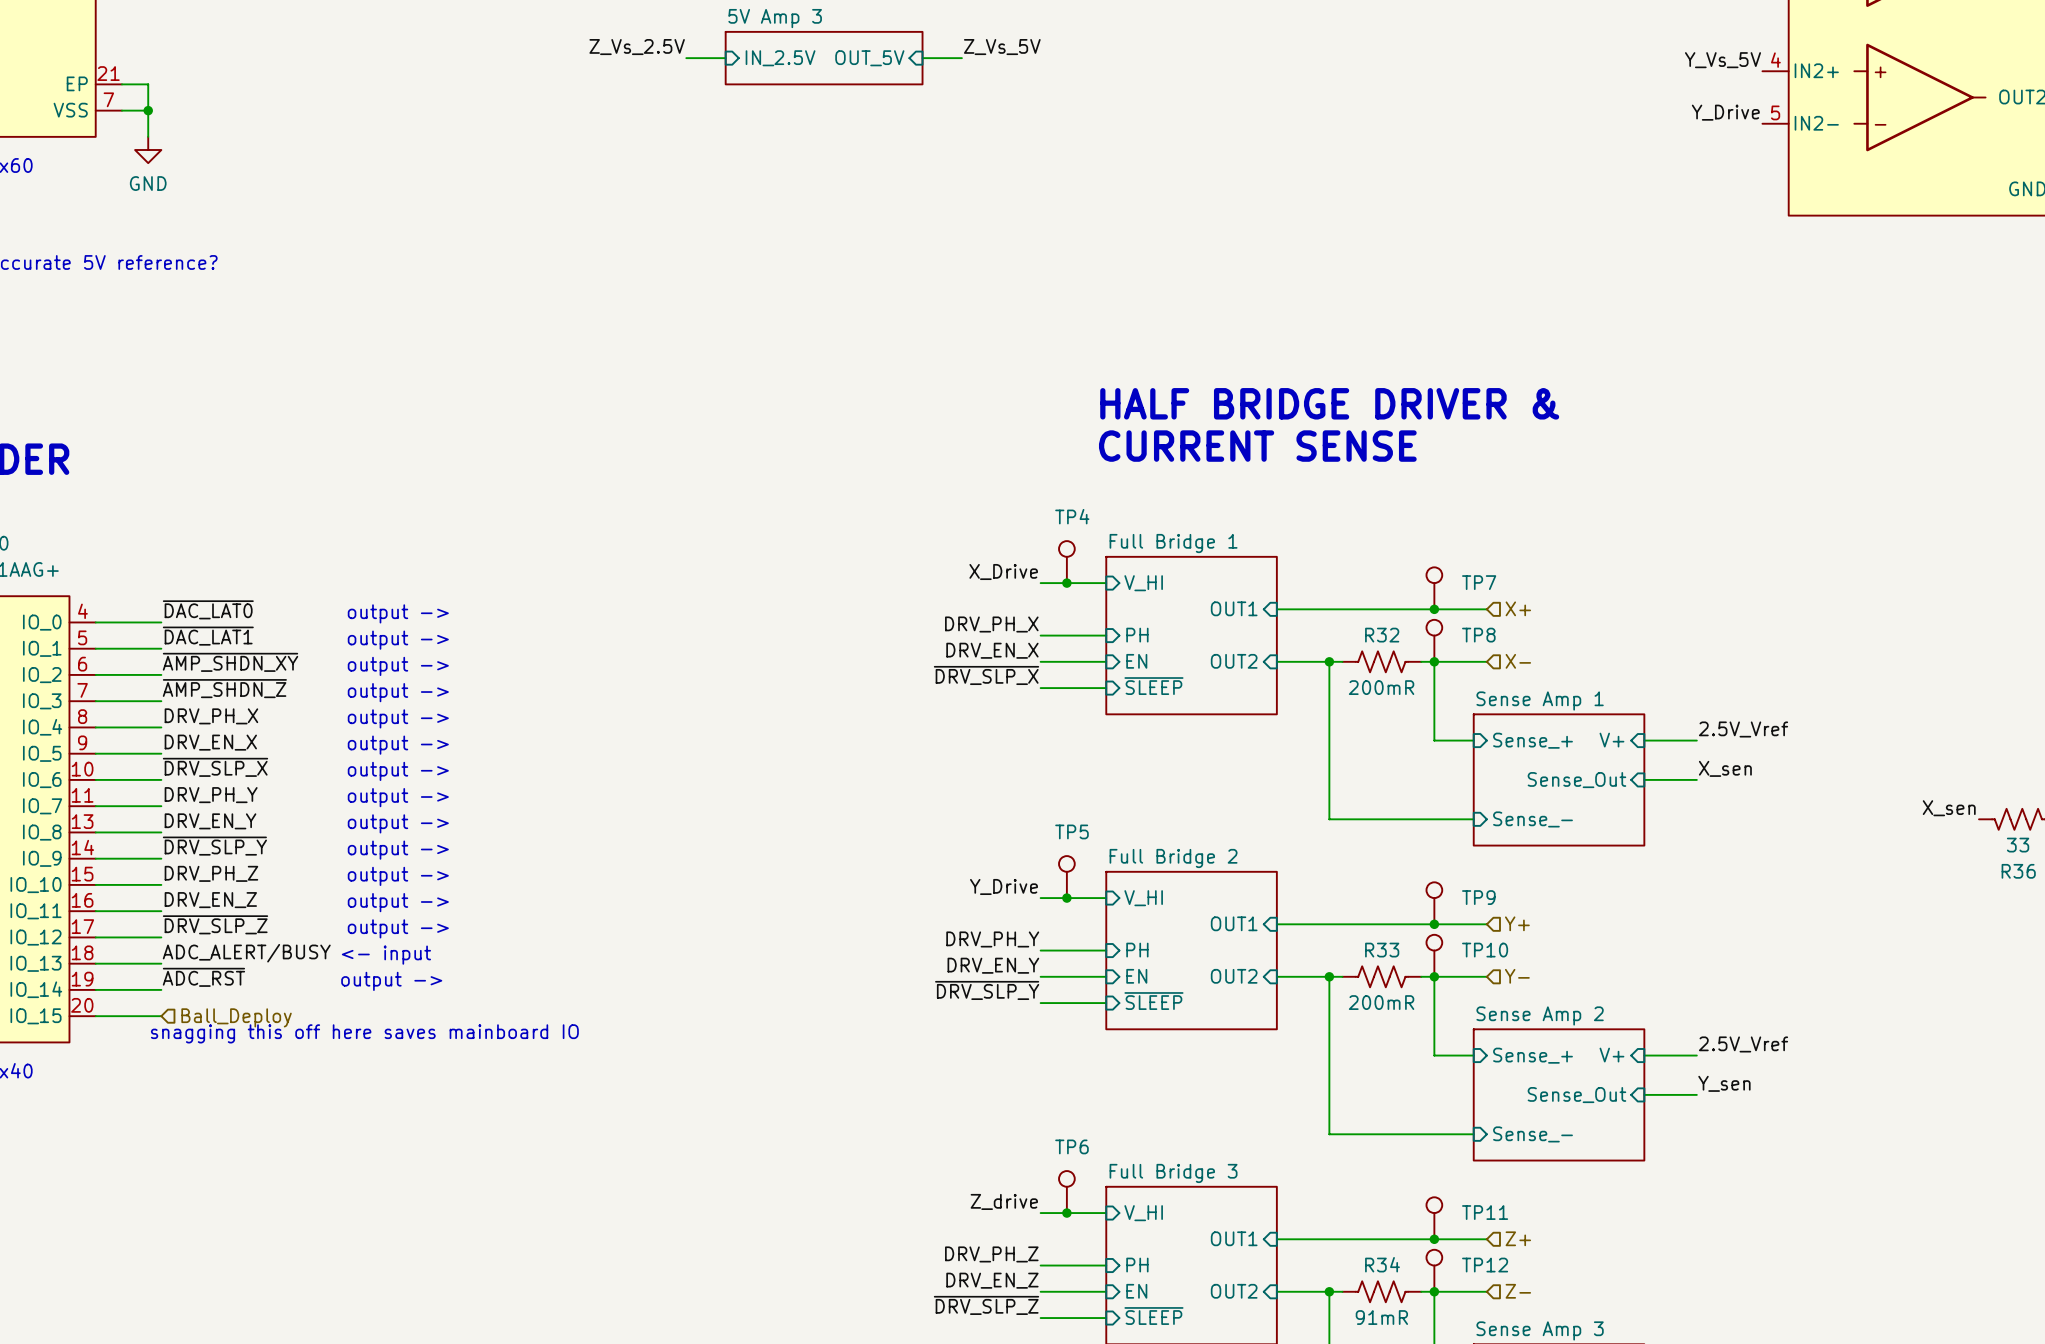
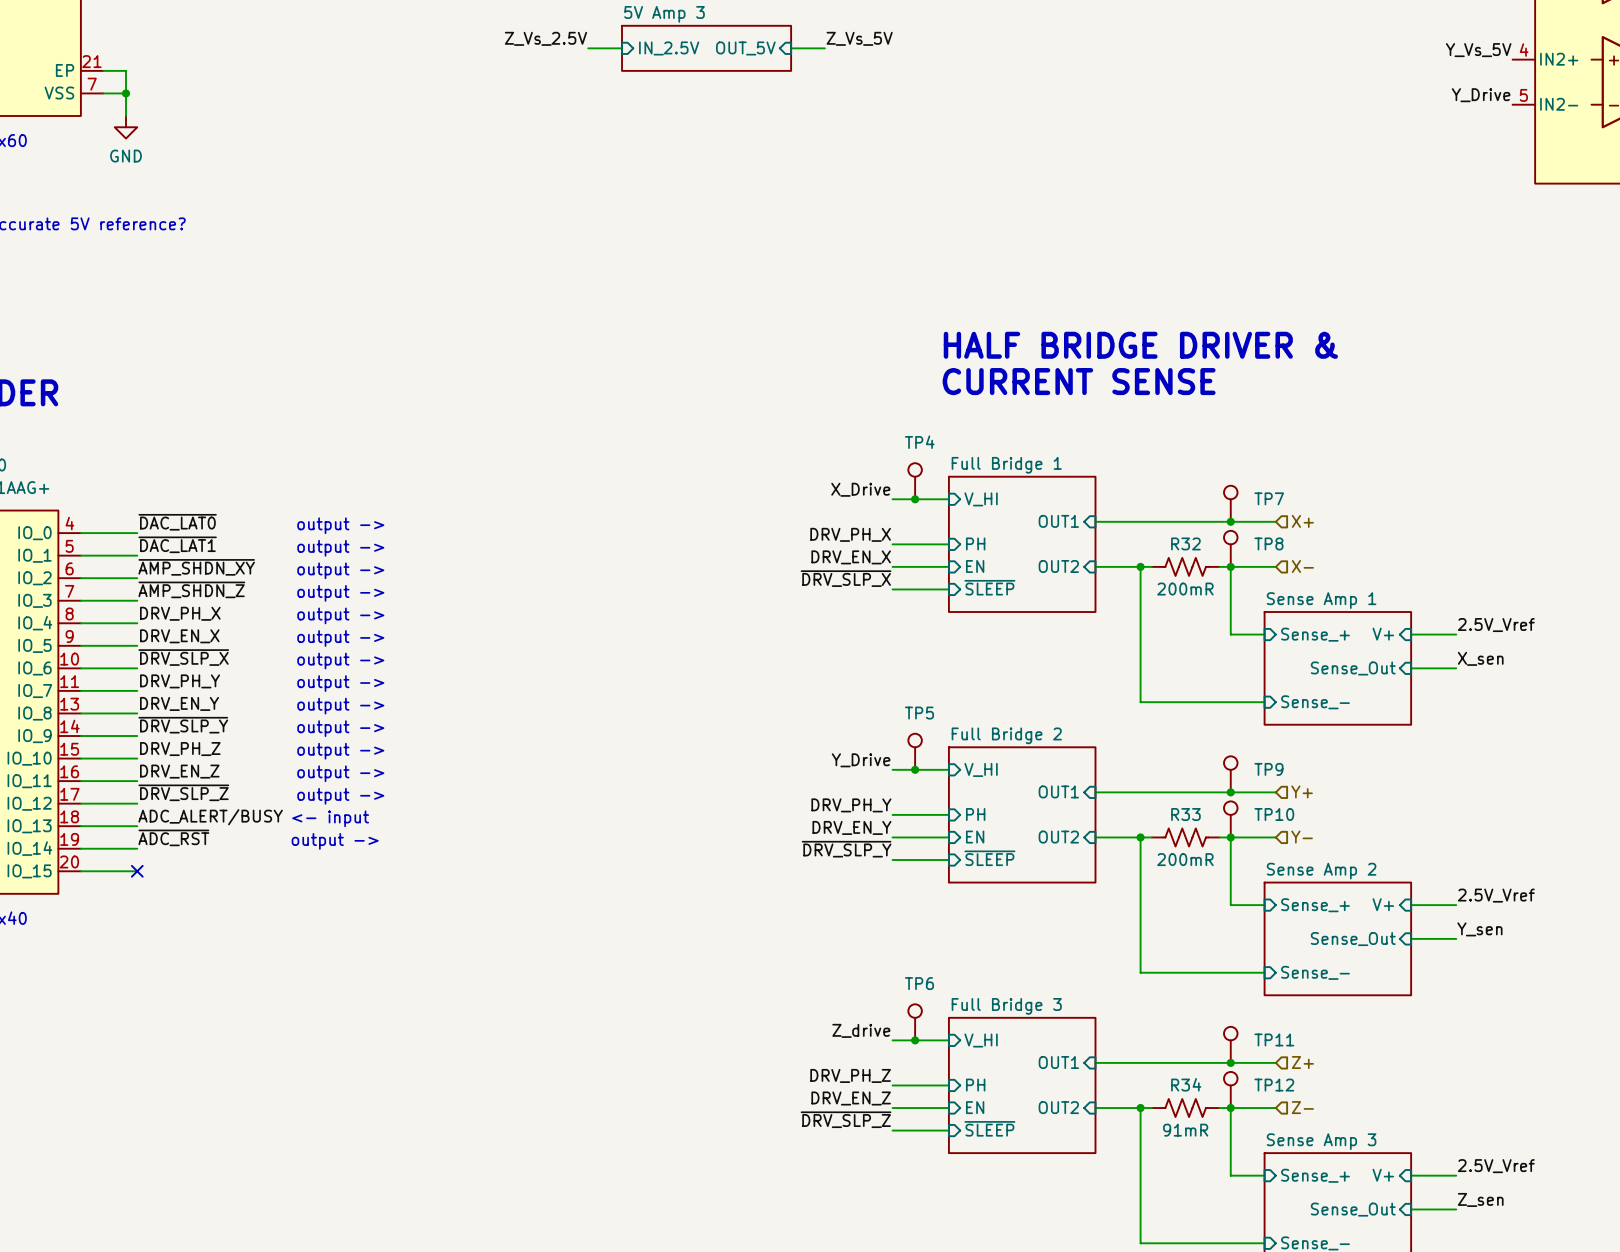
no-connect mark: none -> (137, 871)
hierarchical label: Ball_Deploy (236, 1017) -> none
text: snagging this off here saves mainboard IO (364, 1033) -> none

